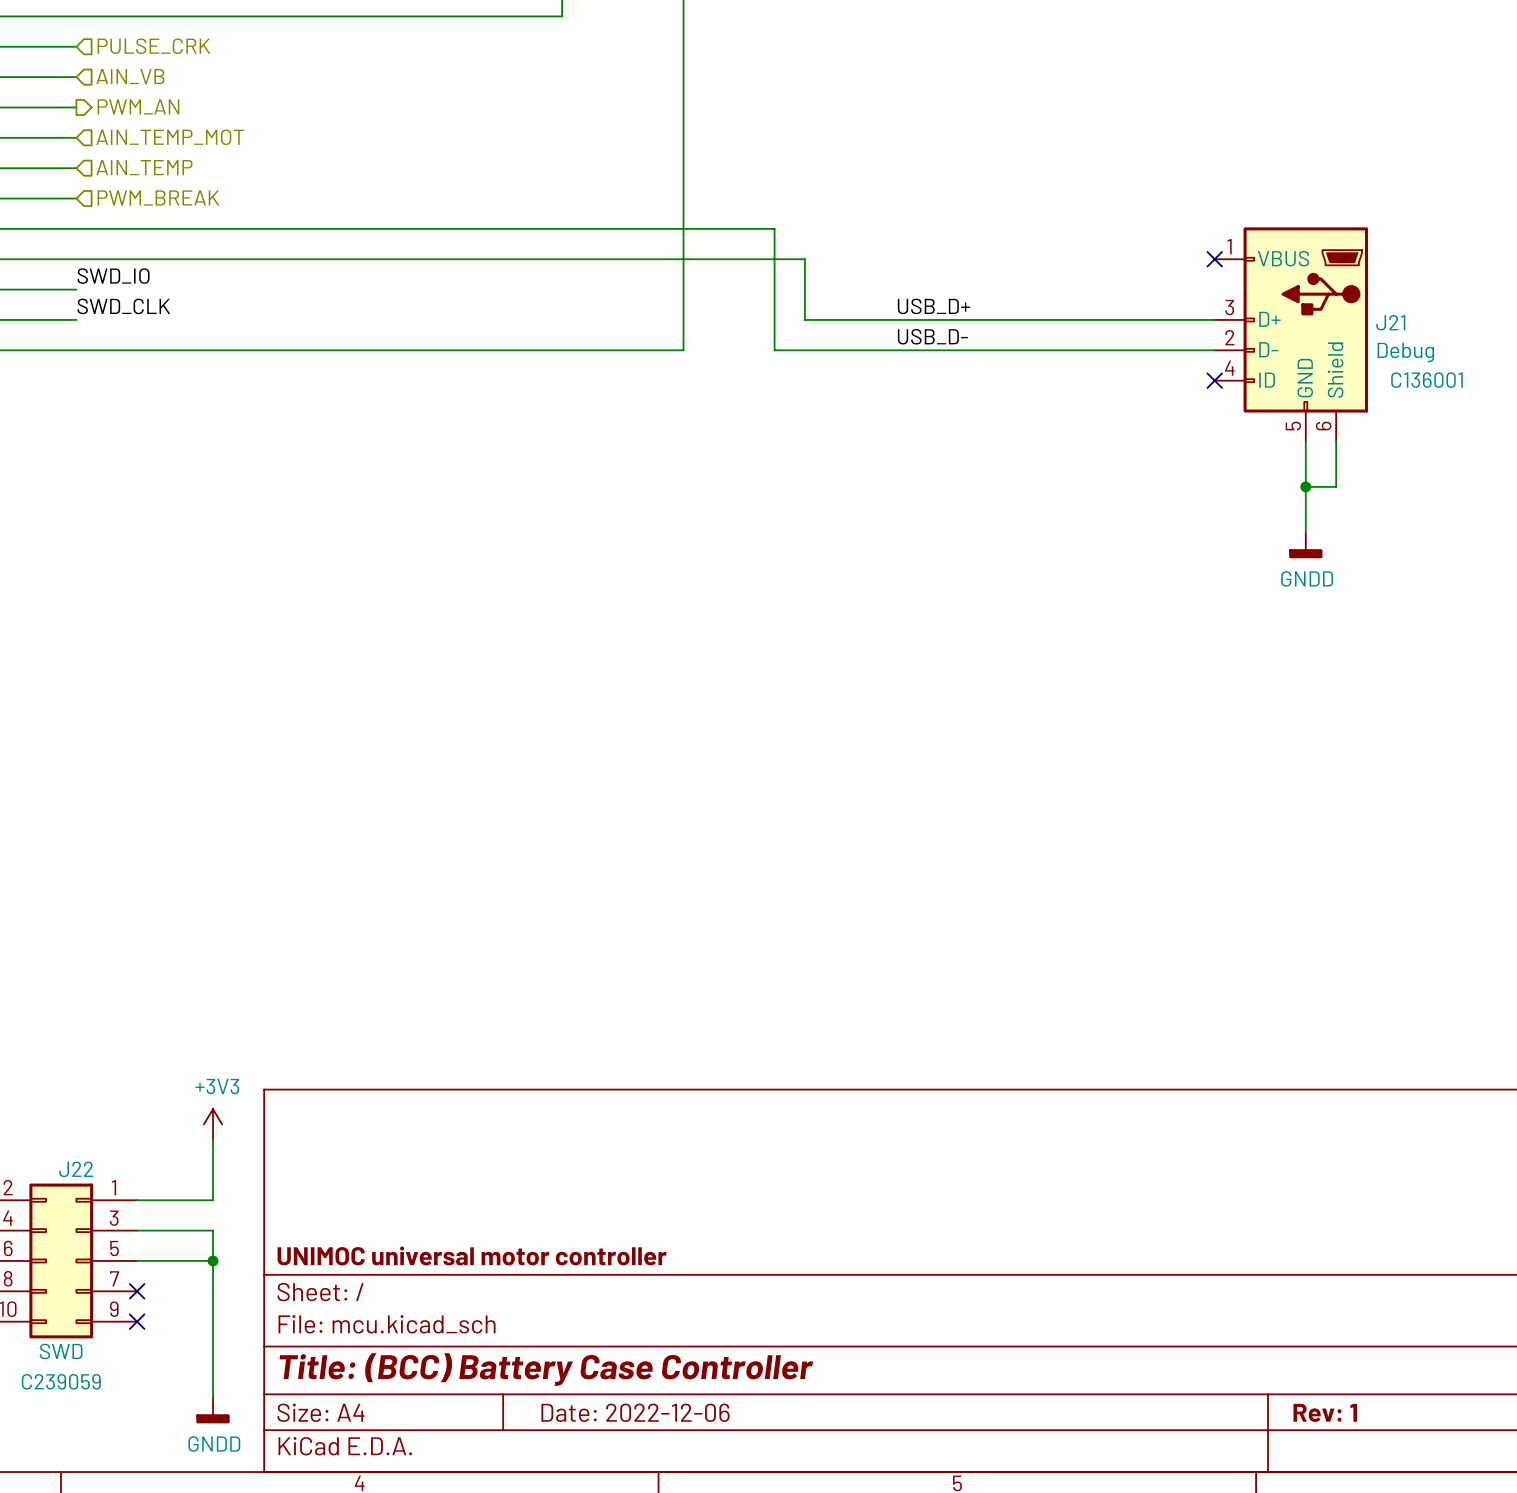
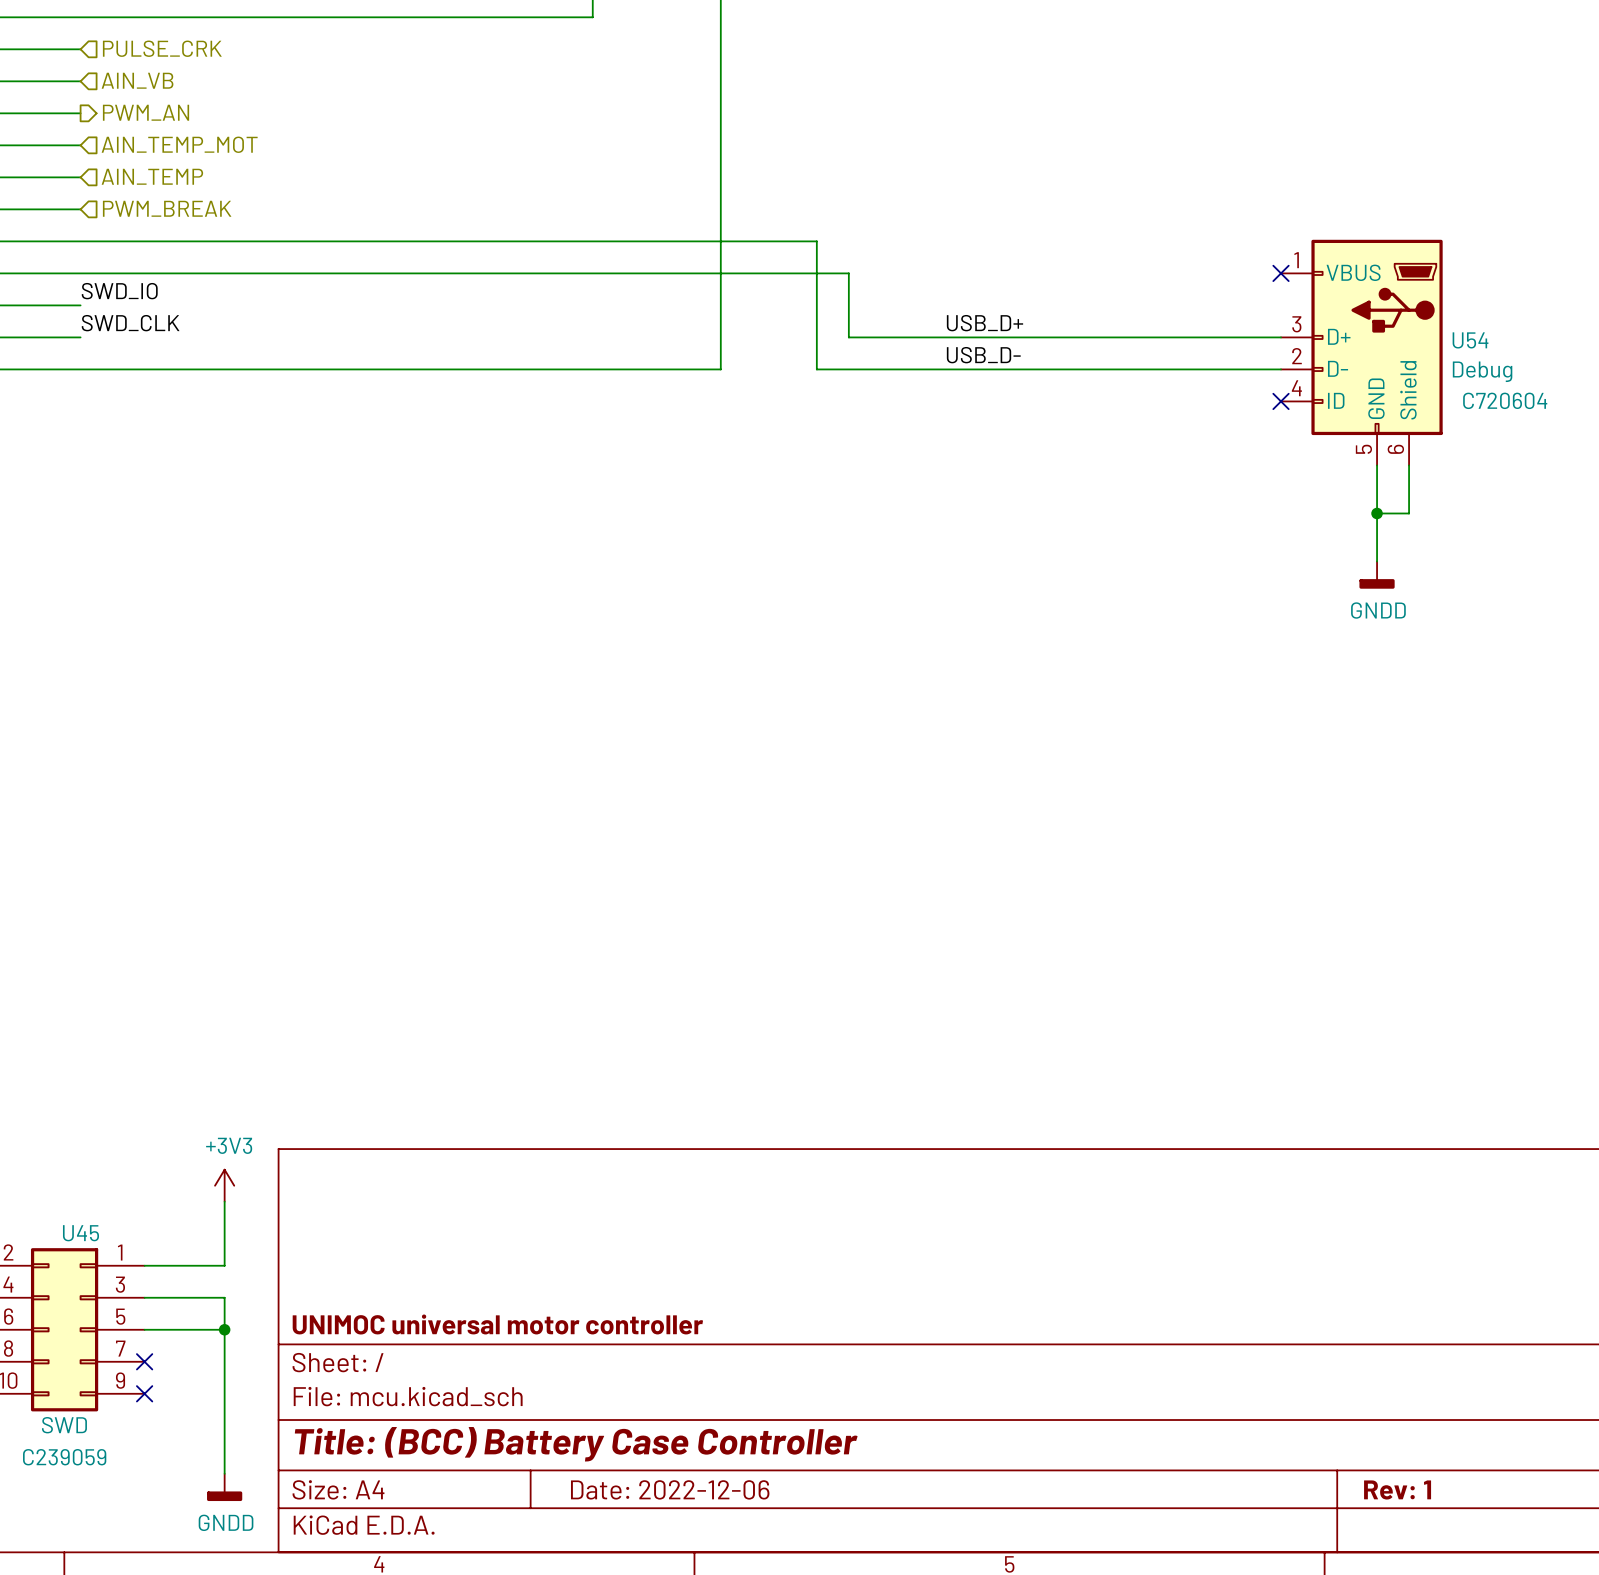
J21 name: J21 (1390, 322) -> U54 (1470, 340)
J21 text: C136001 (1426, 380) -> C720604 (1505, 400)
J22 name: J22 (76, 1169) -> U45 (80, 1233)

